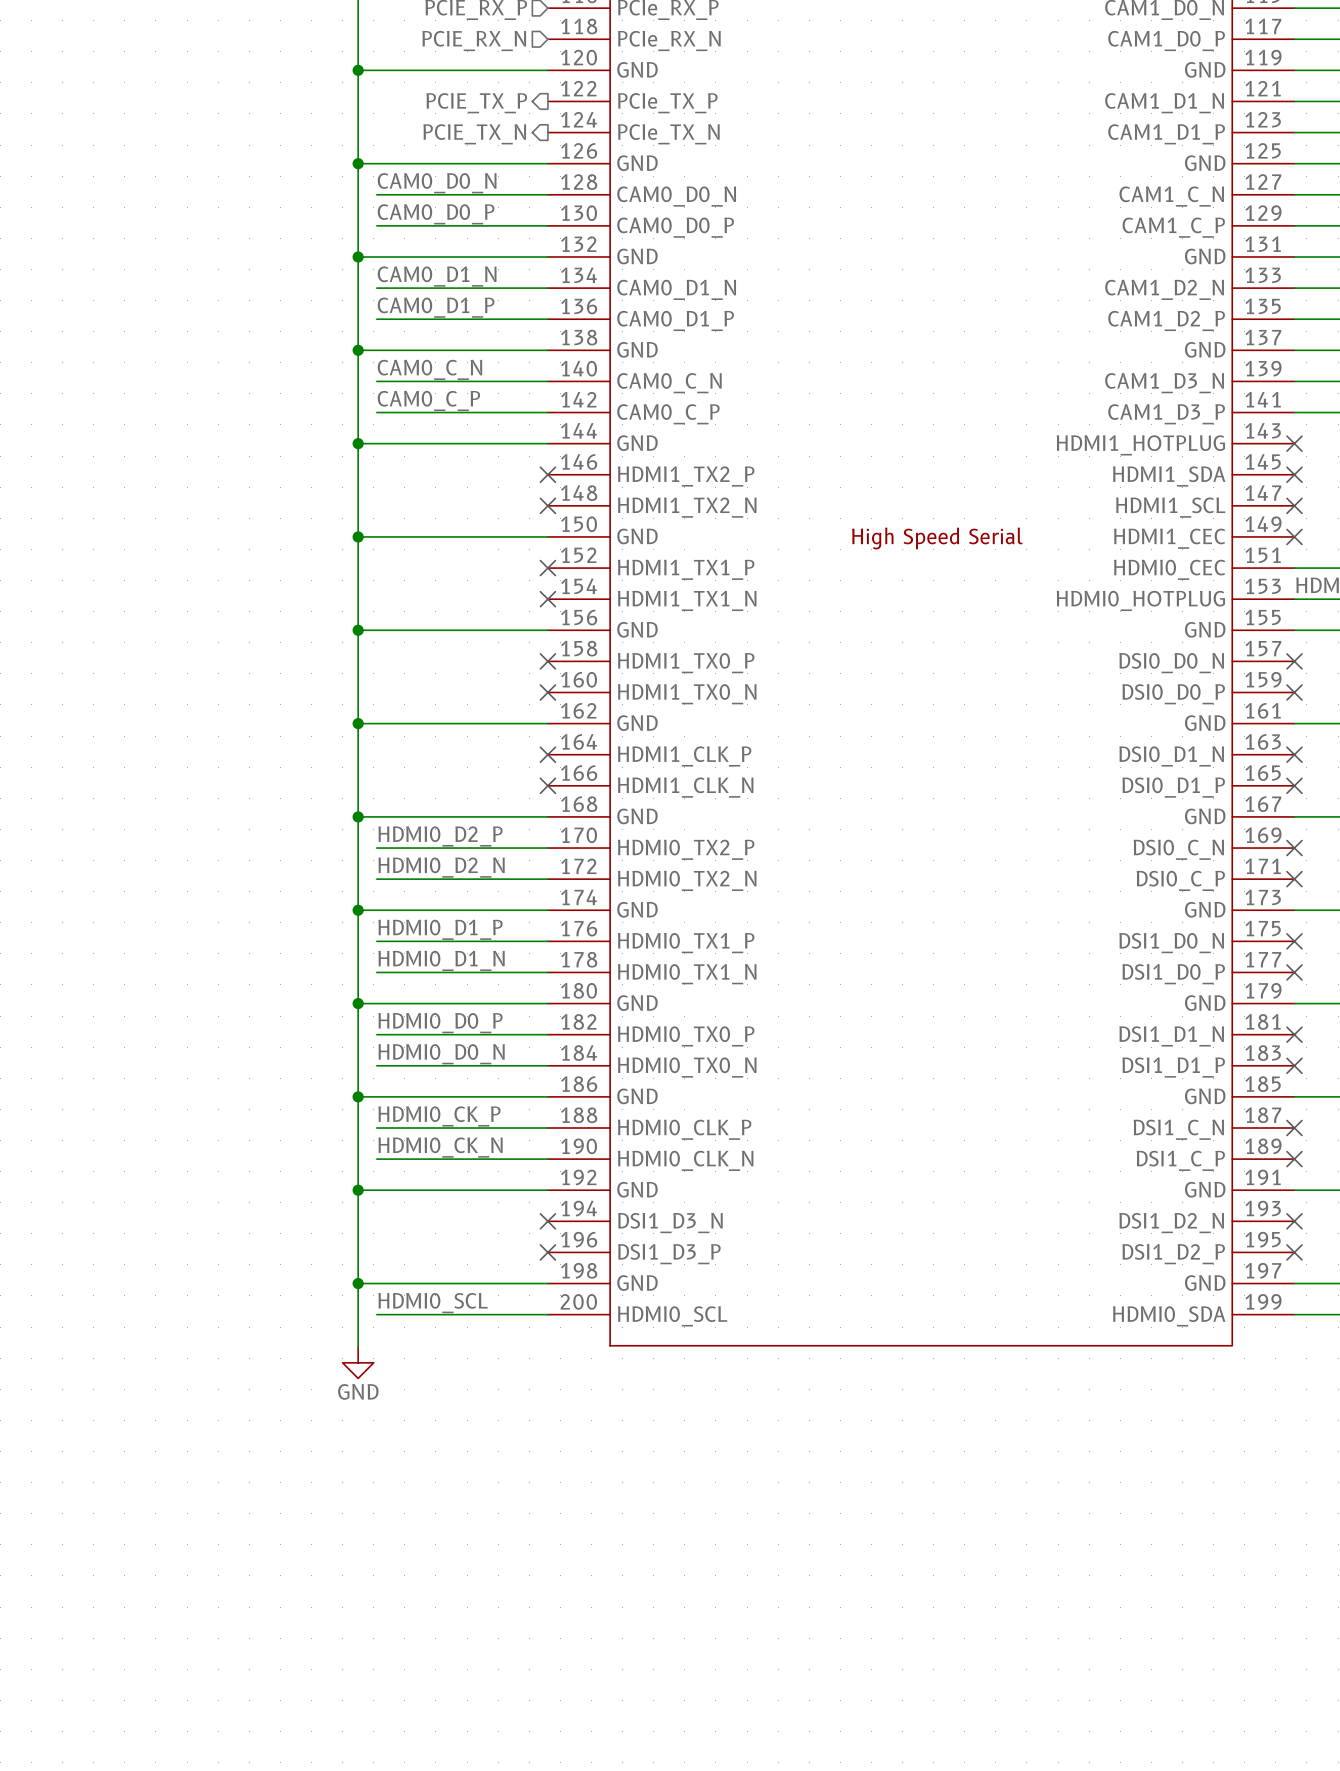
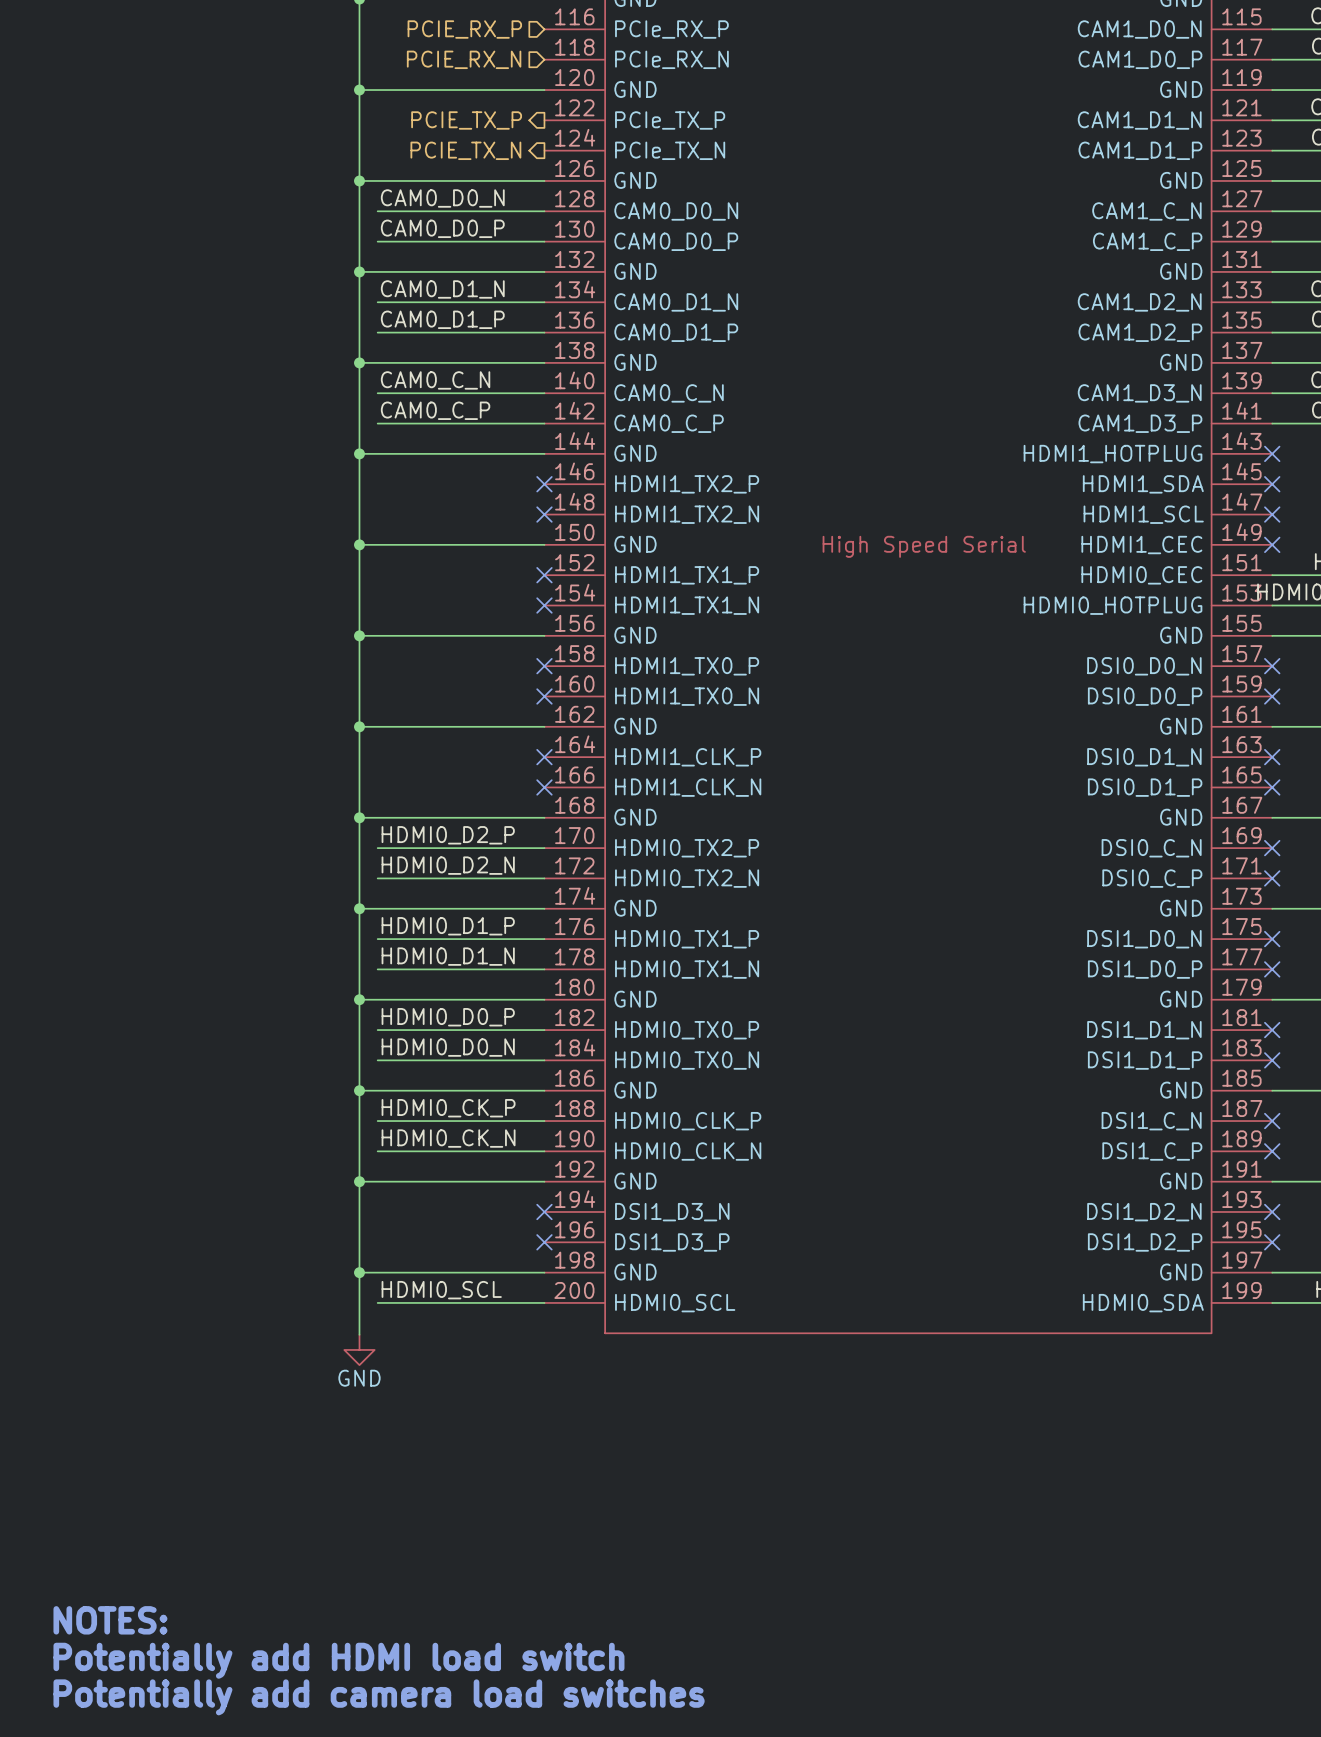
text: none -> NOTES: (110, 1620)
text: none -> Potentially add HDMI load switch (338, 1660)
text: none -> Potentially add camera load switches (379, 1697)

